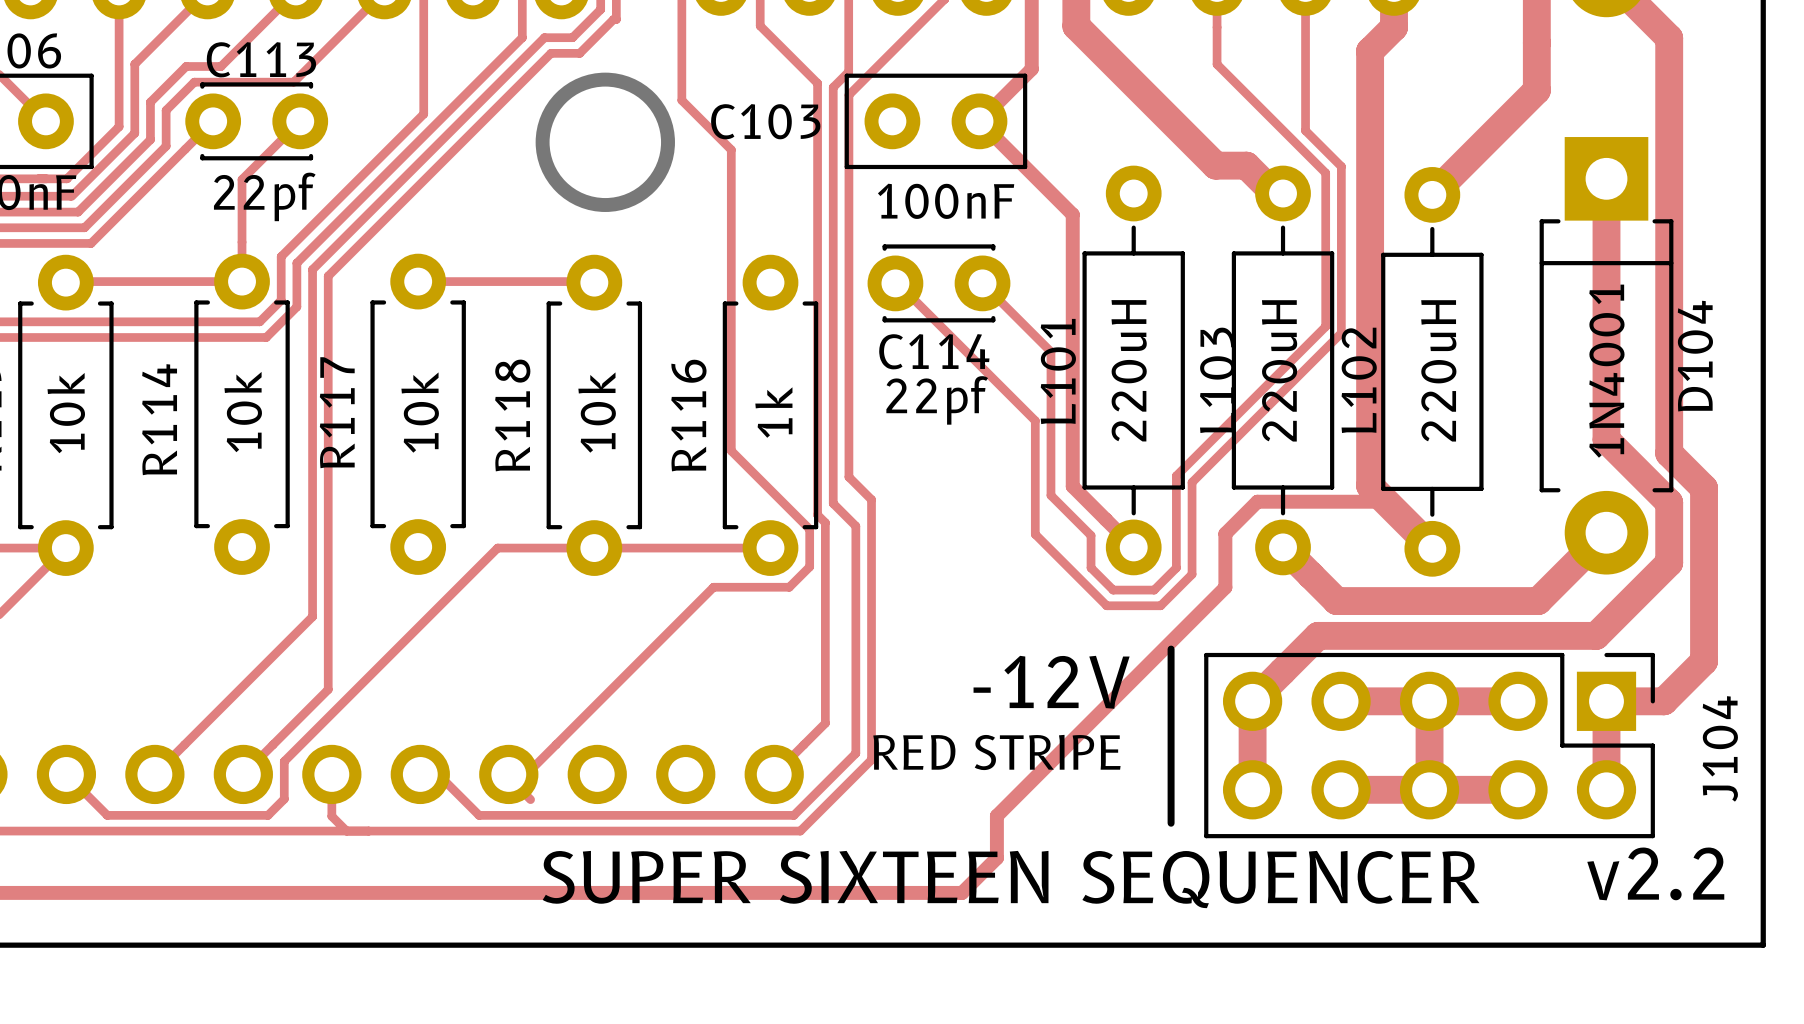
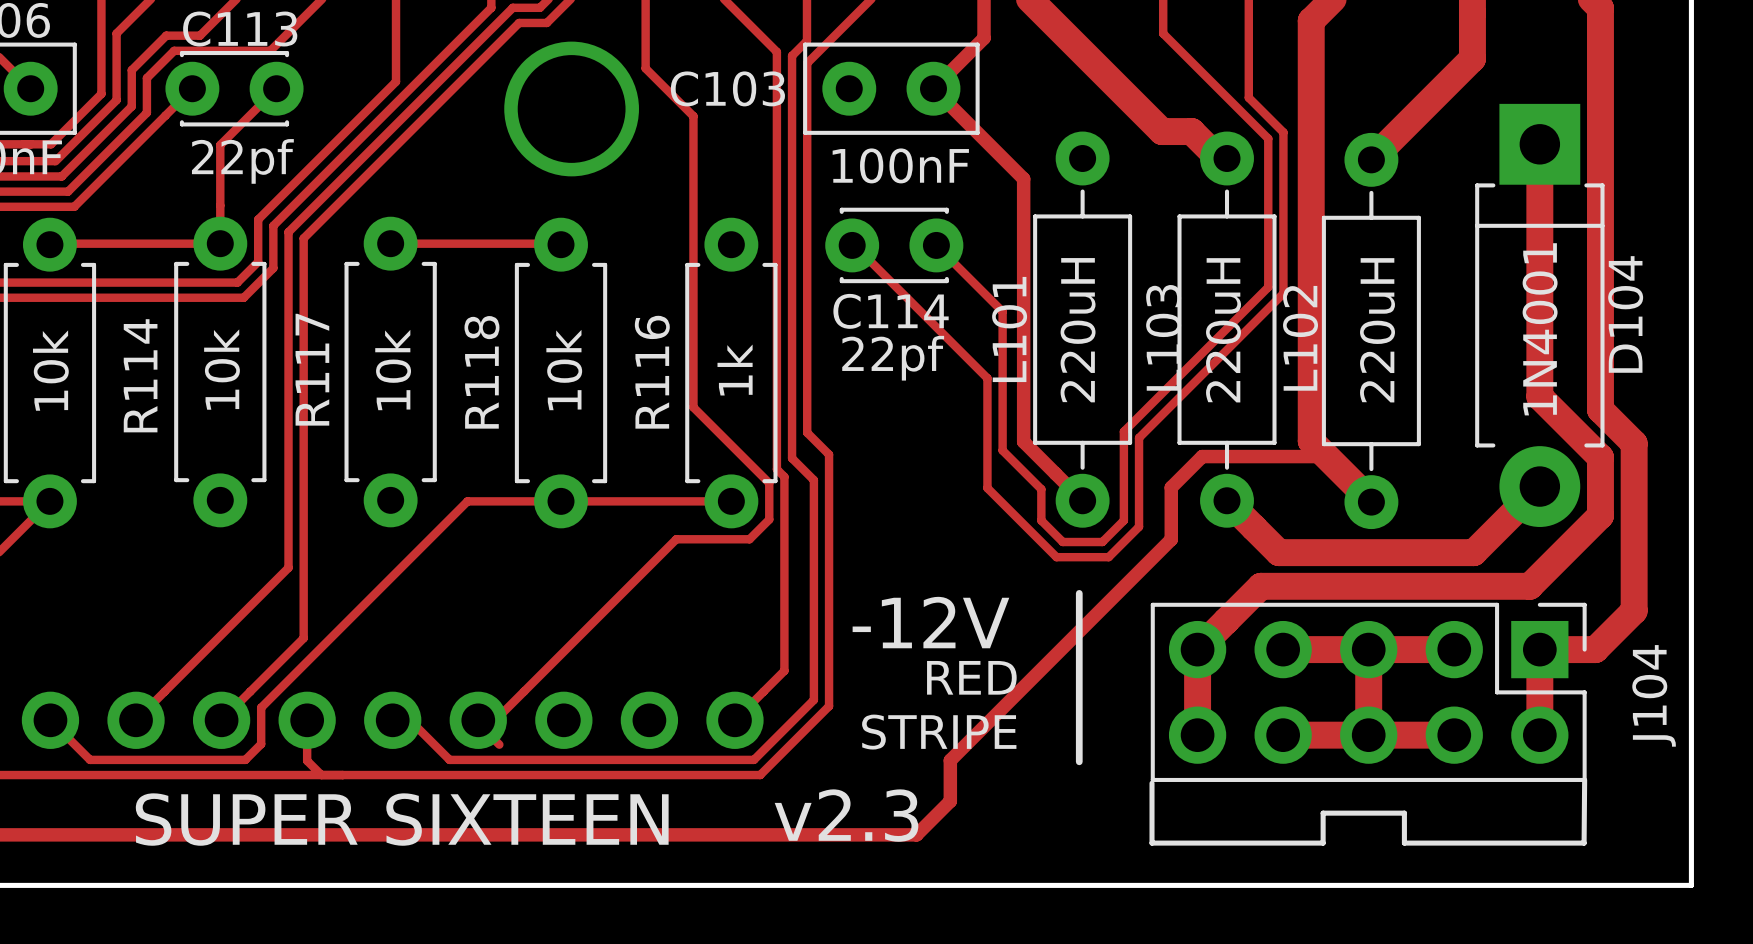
line: (1171, 649) (1171, 823) -> (1079, 593) (1079, 761)
text position: -12V (1051, 682) -> -12V (930, 622)
text: none -> RED (971, 677)
text: RED STRIPE (996, 752) -> STRIPE (939, 732)
line: none -> (1584, 779) (1584, 843) (1404, 843) (1404, 813) (1323, 813) (1323, 843) (1152, 843) (1152, 783)
text: none -> v2.3 (846, 815)
text: v2.2 (1655, 873) -> none
text: SUPER SIXTEEN SEQUENCER (1011, 879) -> SUPER SIXTEEN (402, 819)

